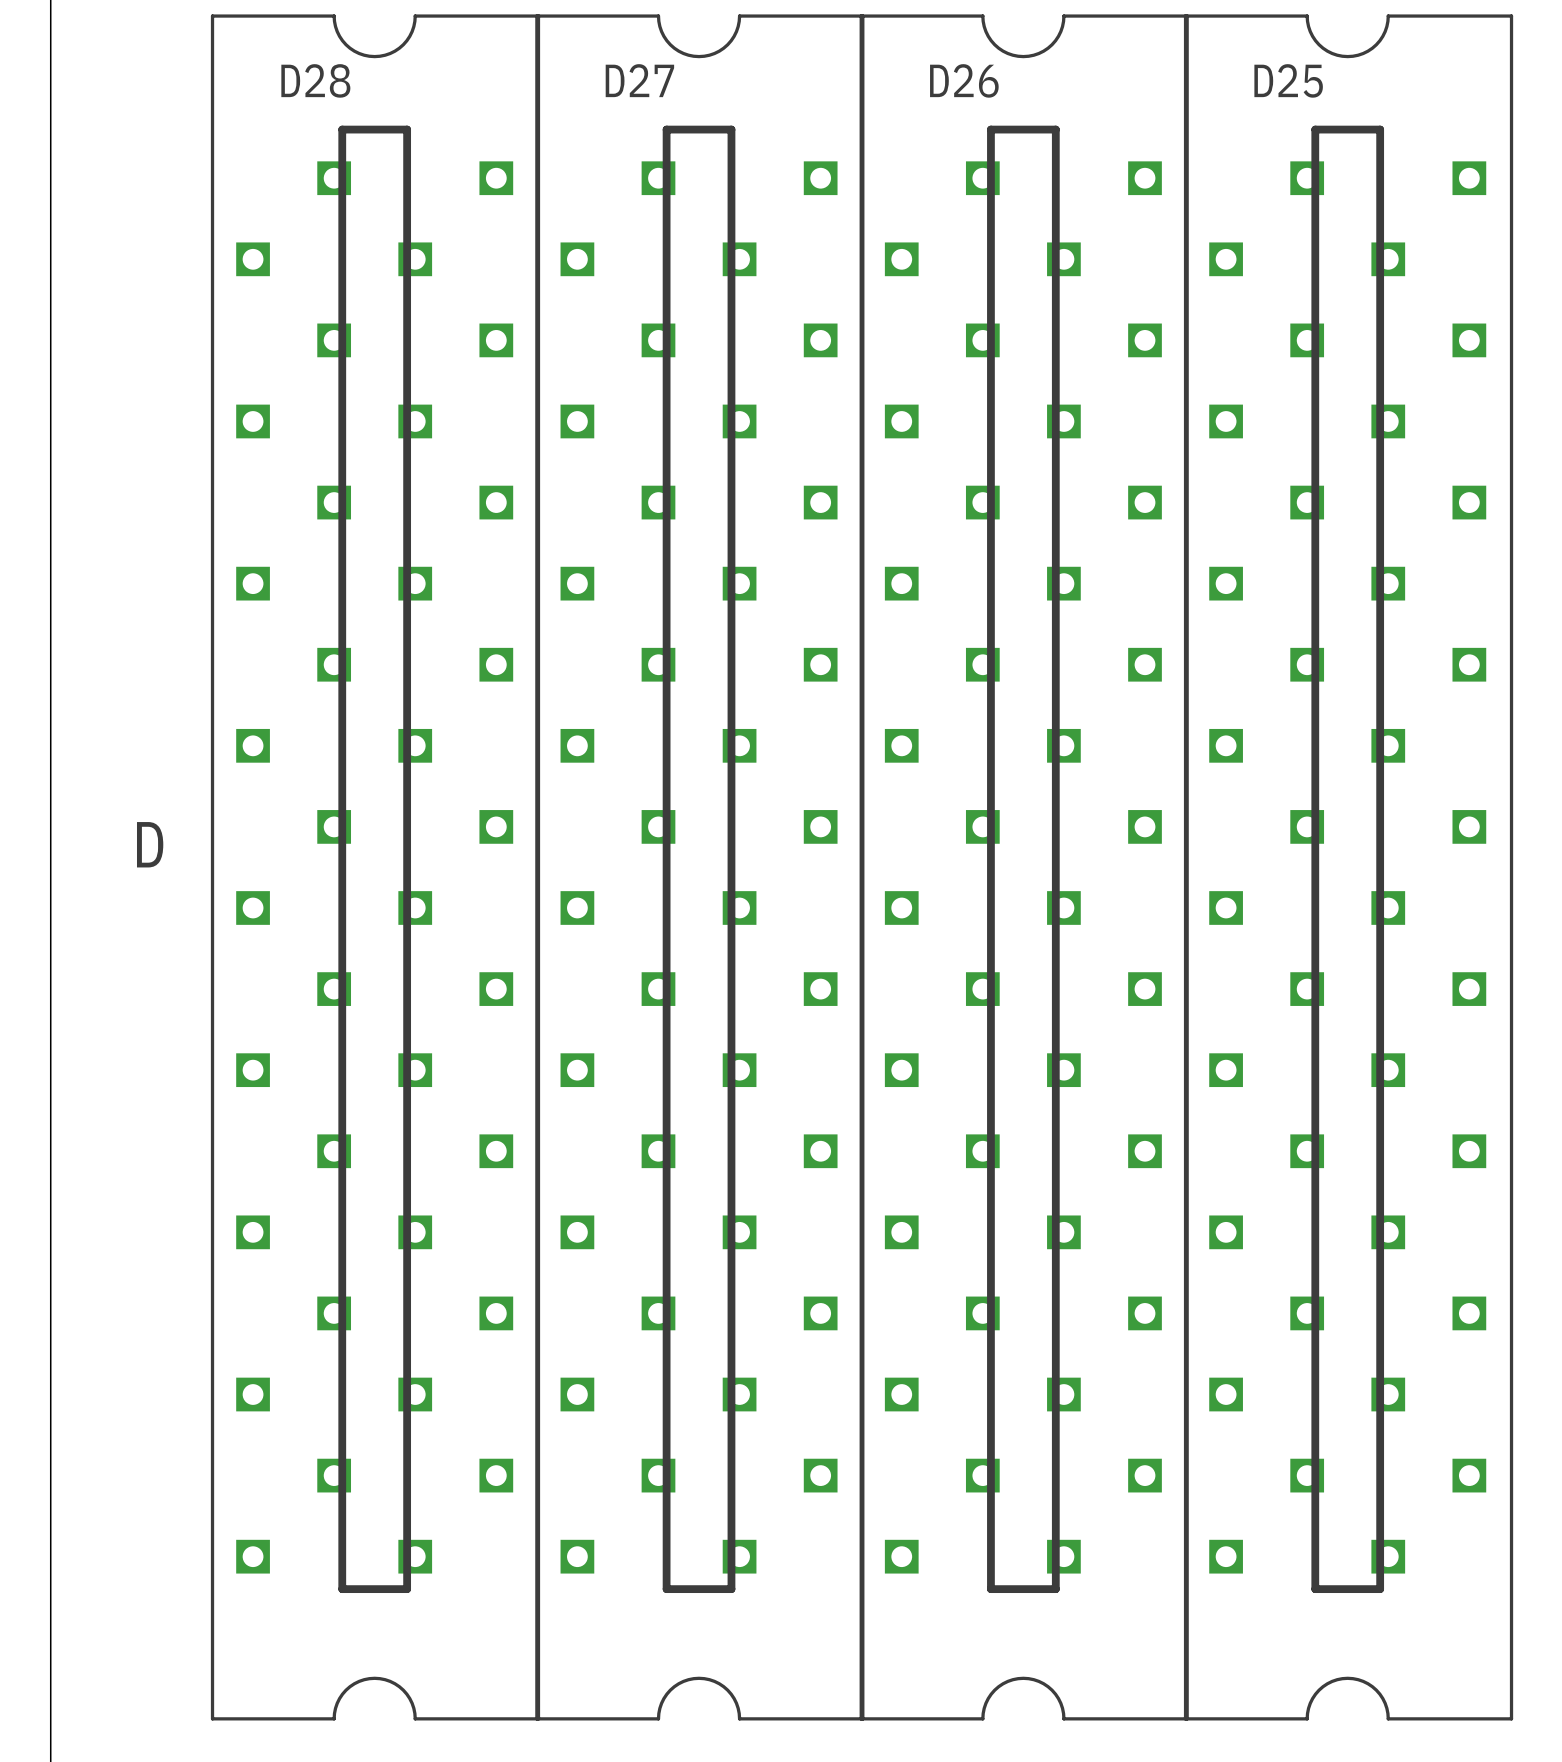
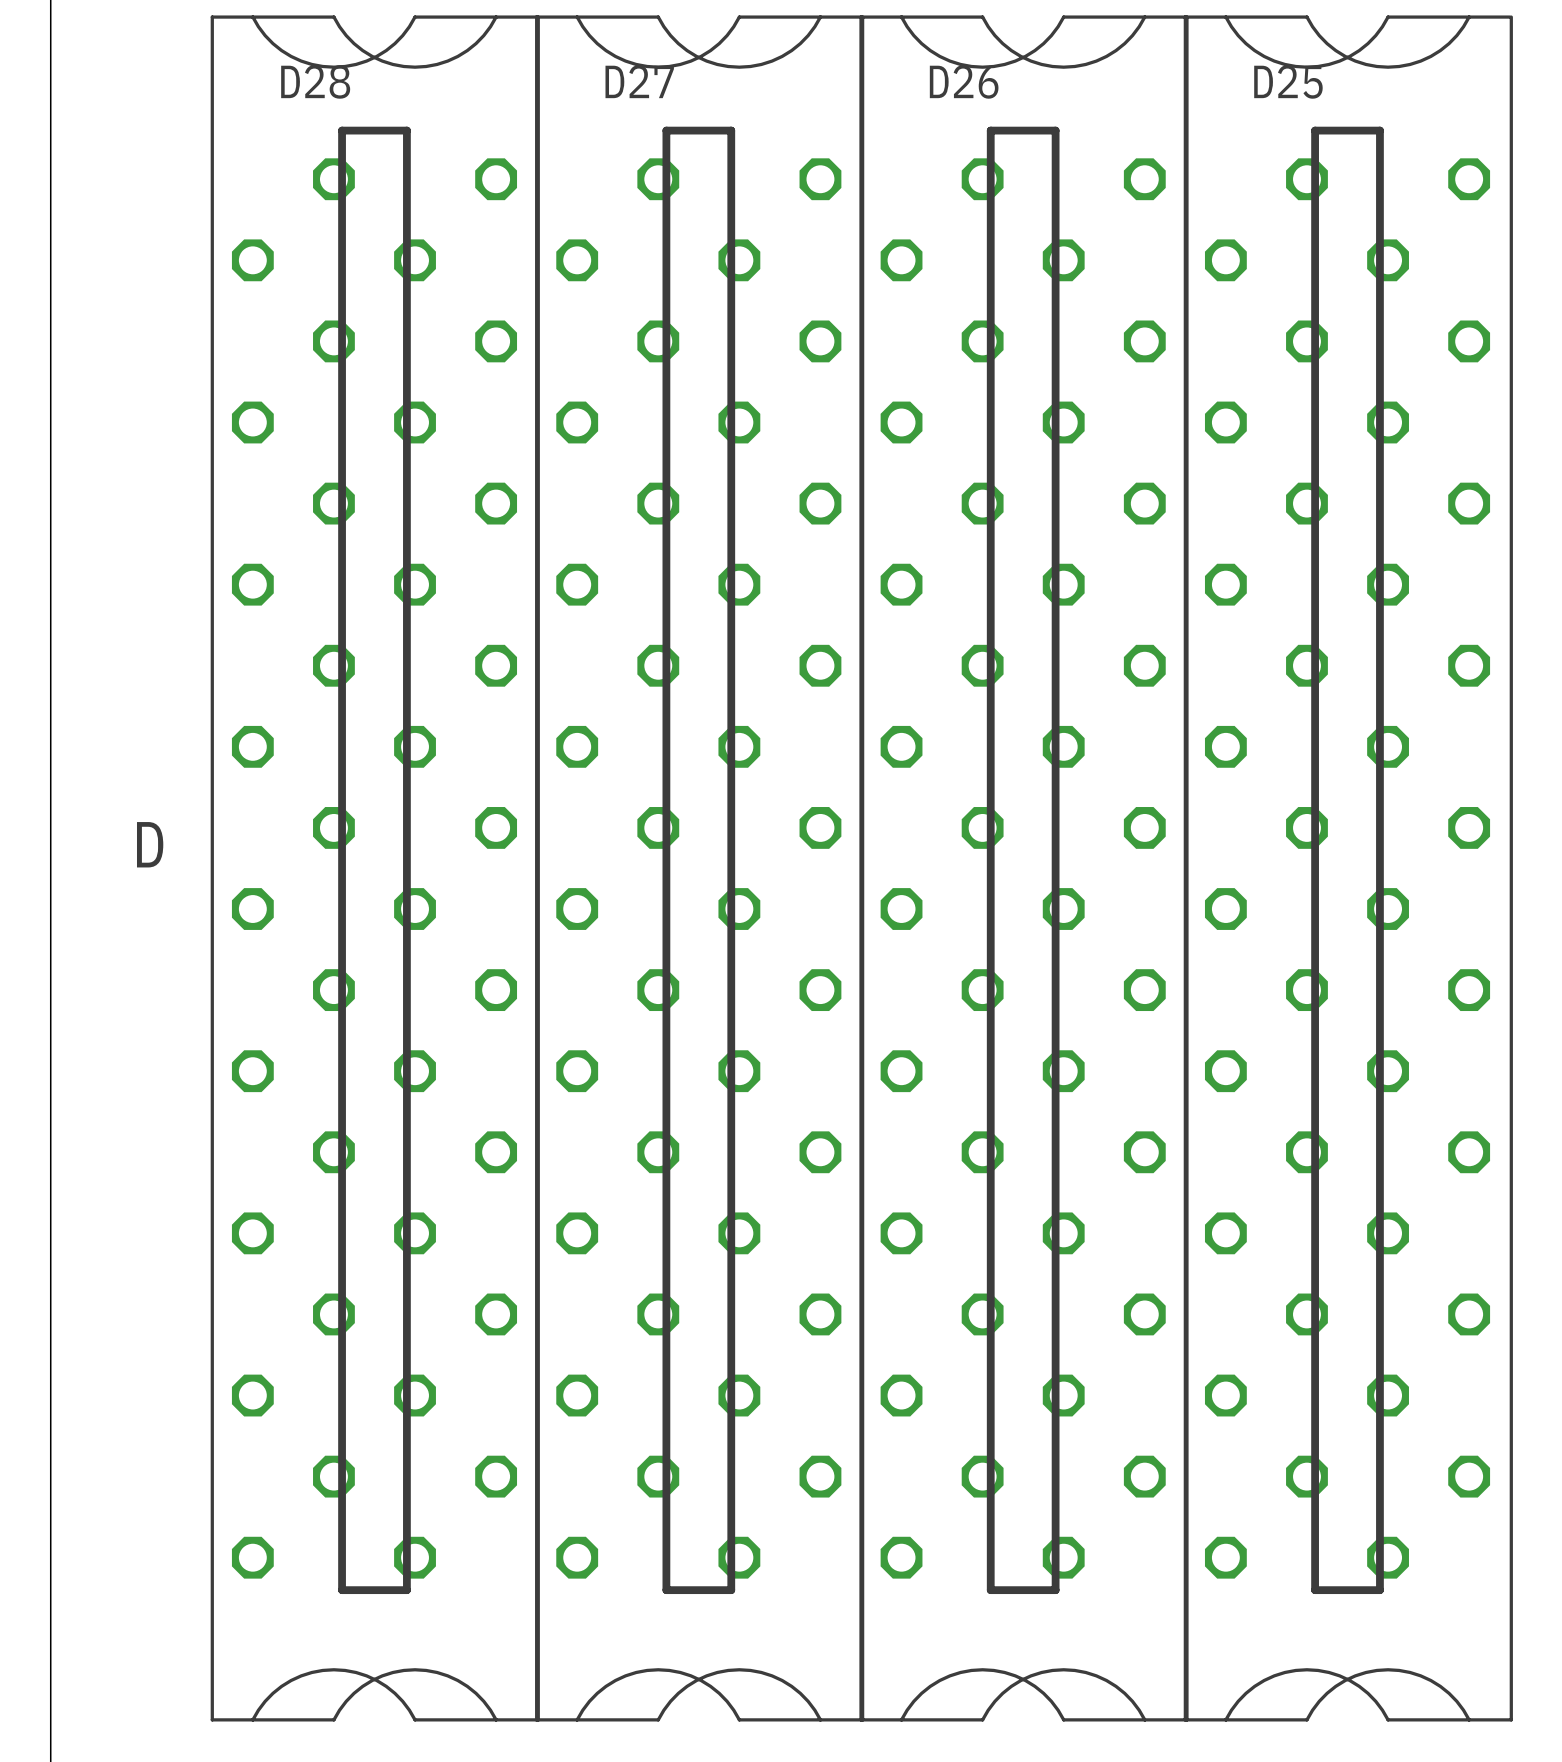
D28 footprint: [210, 14, 541, 1721] -> [210, 15, 540, 1722]
D27 footprint: [535, 14, 865, 1721] -> [535, 15, 865, 1722]
D26 footprint: [859, 14, 1189, 1721] -> [859, 15, 1189, 1722]
D25 footprint: [1183, 14, 1514, 1721] -> [1183, 15, 1513, 1722]

